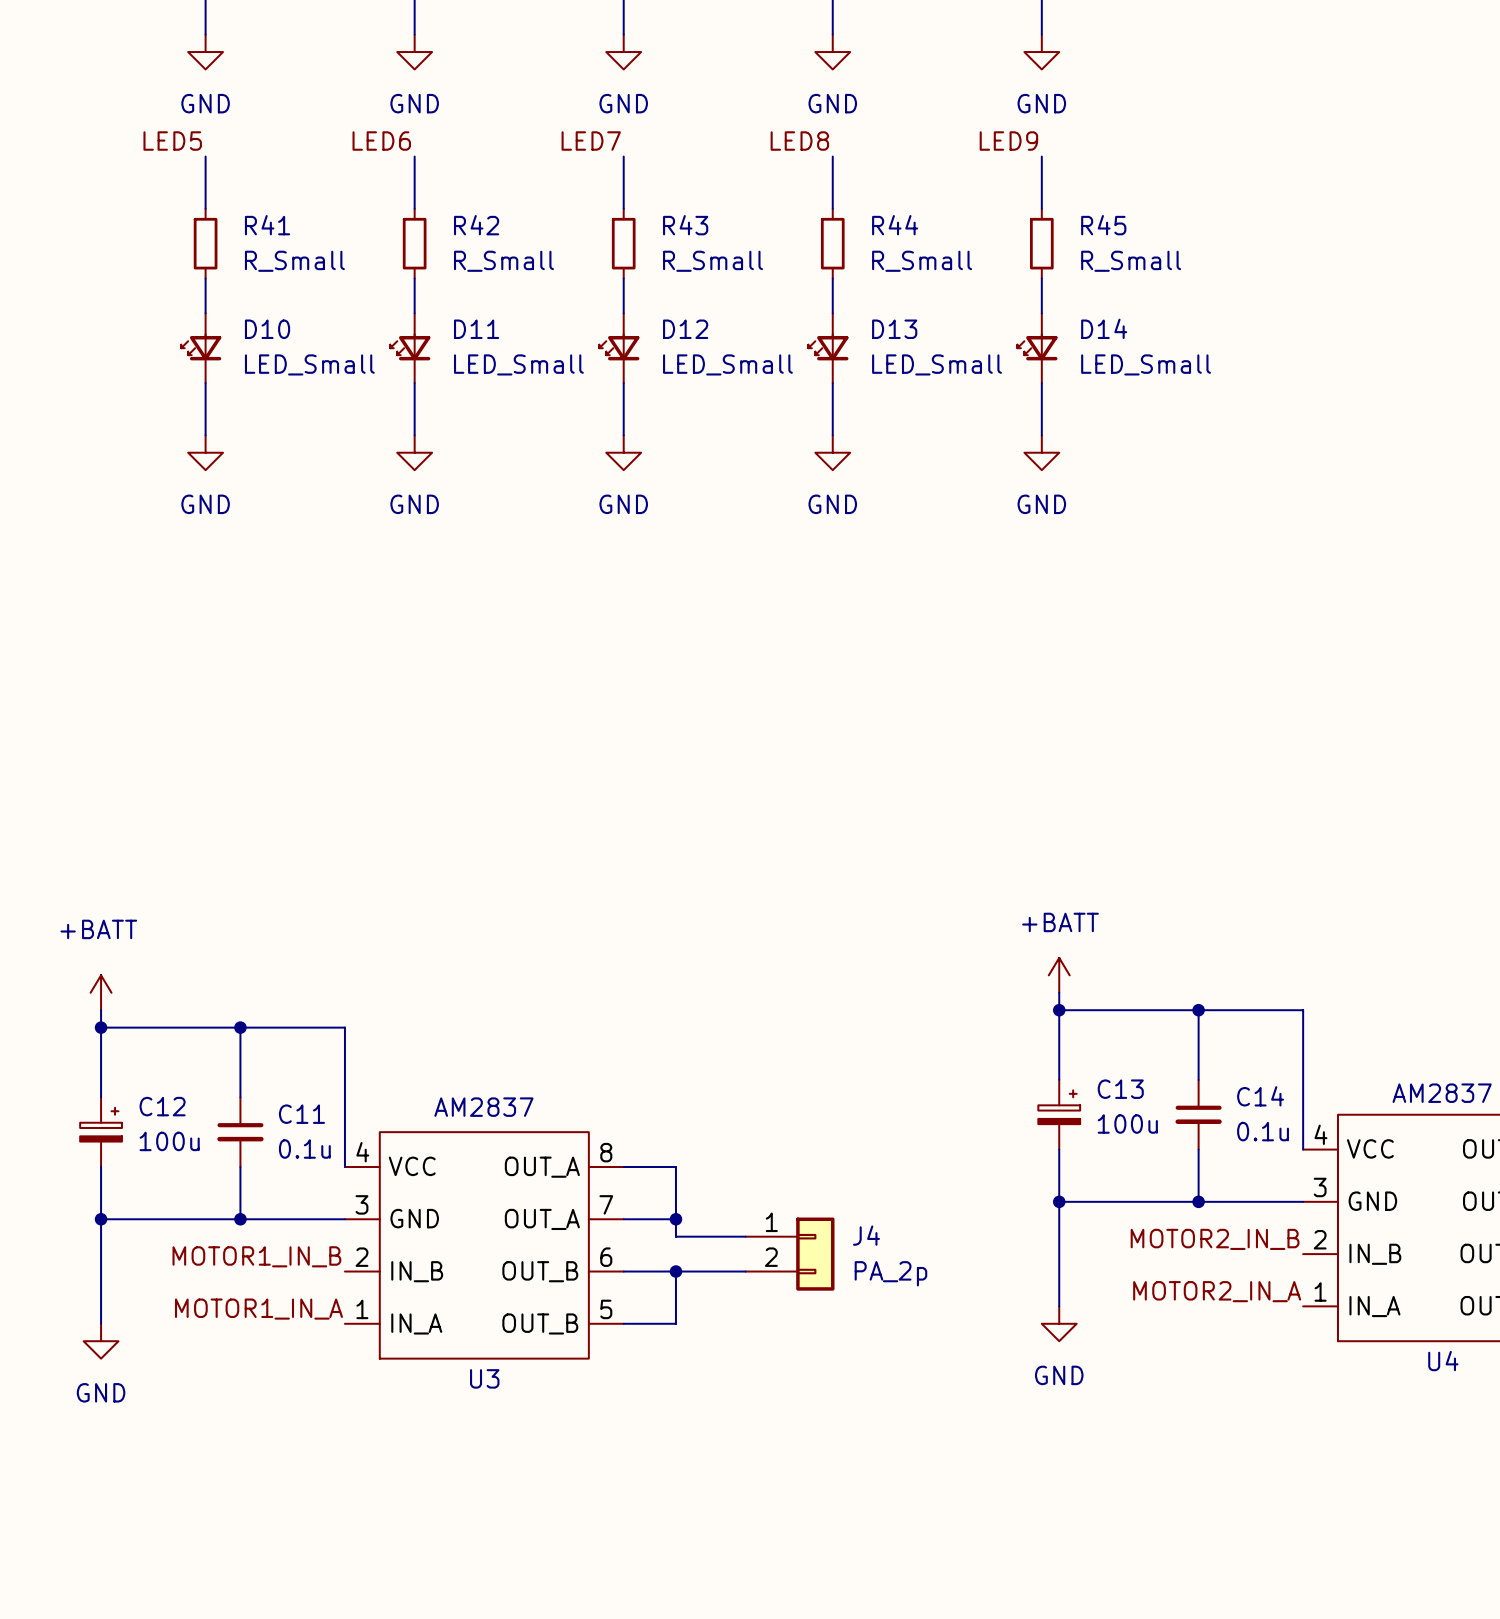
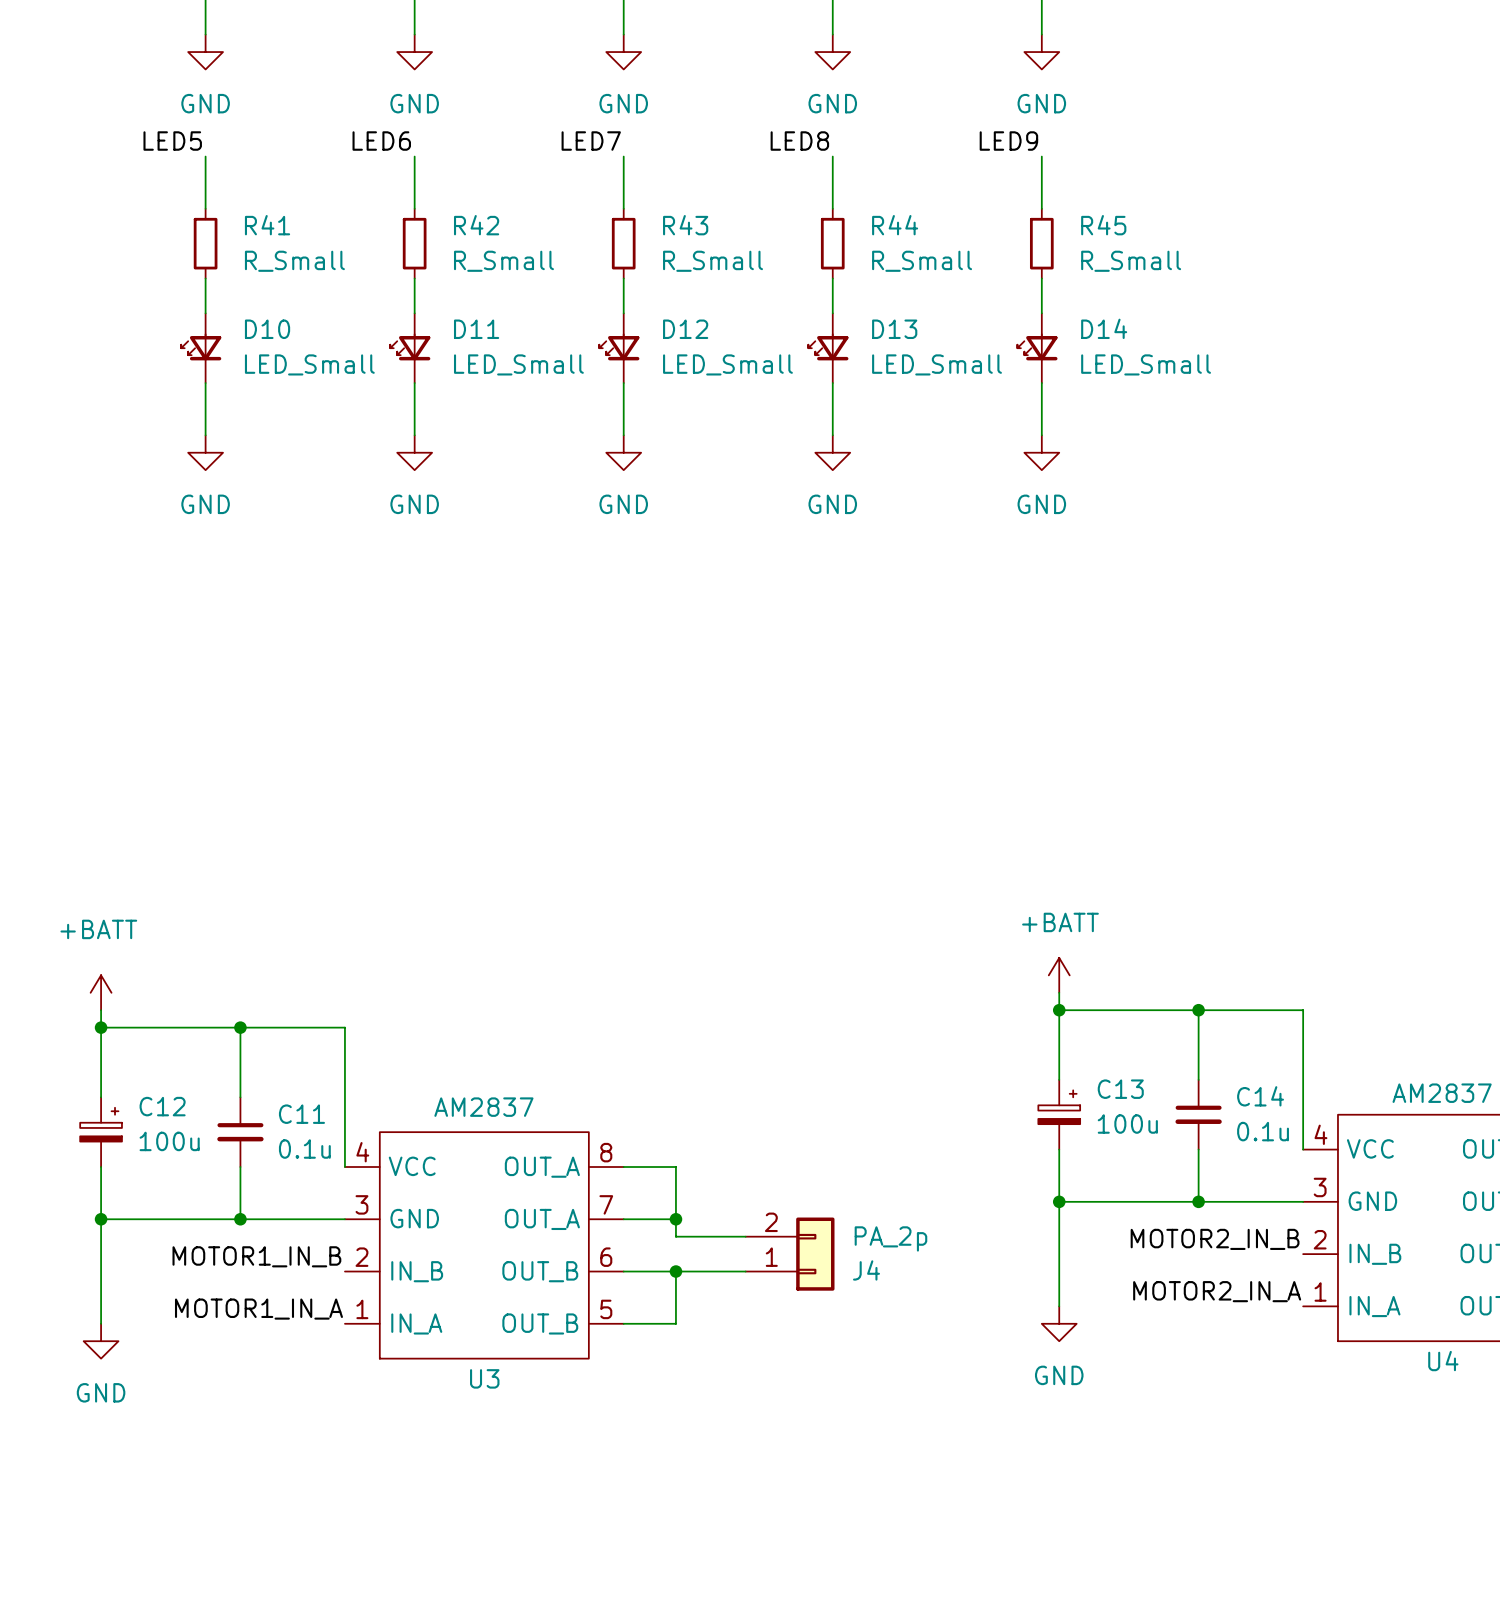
J4 flip: as is (815, 1254) -> up-down (815, 1254)

